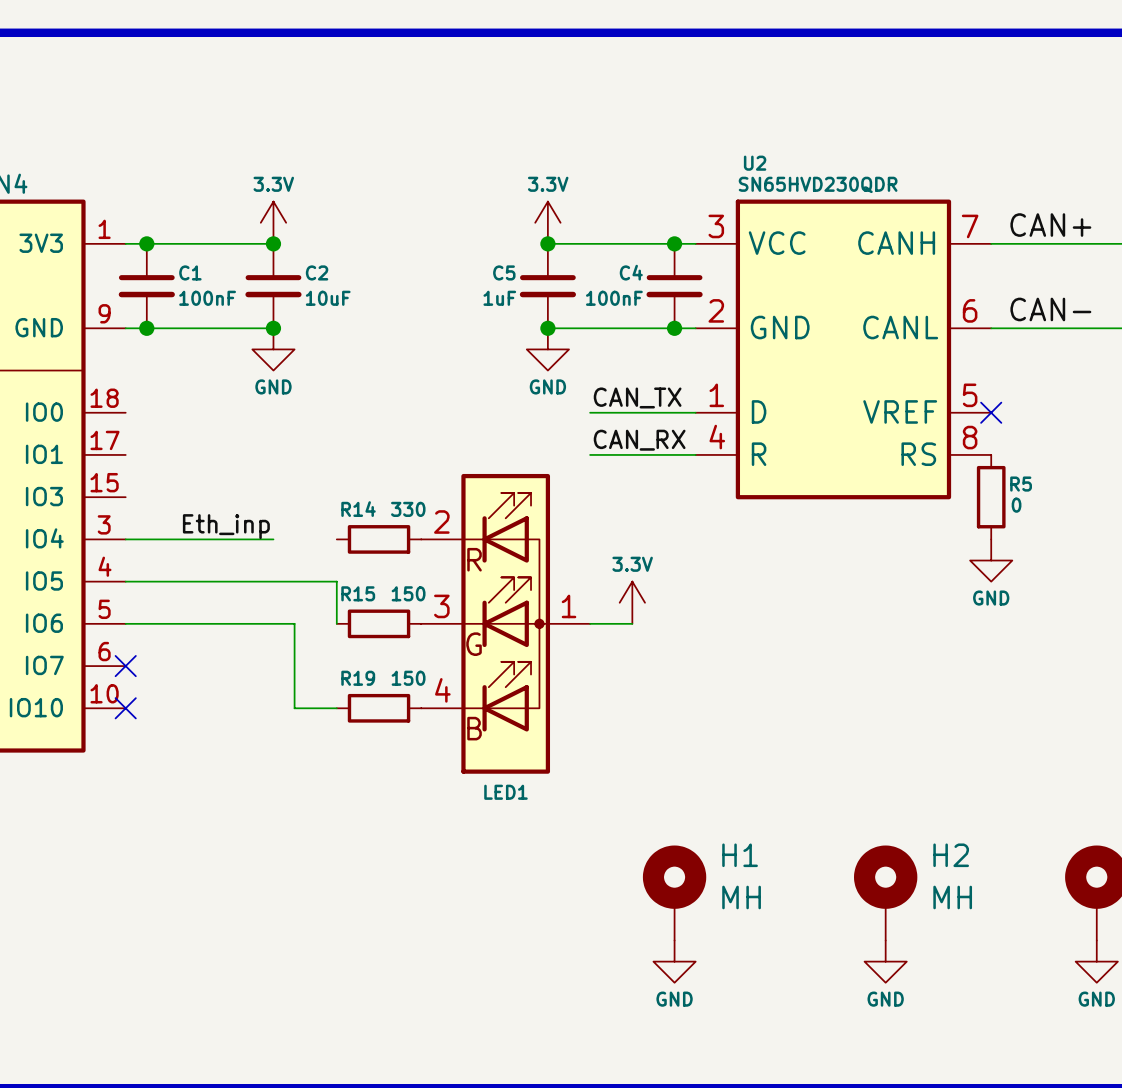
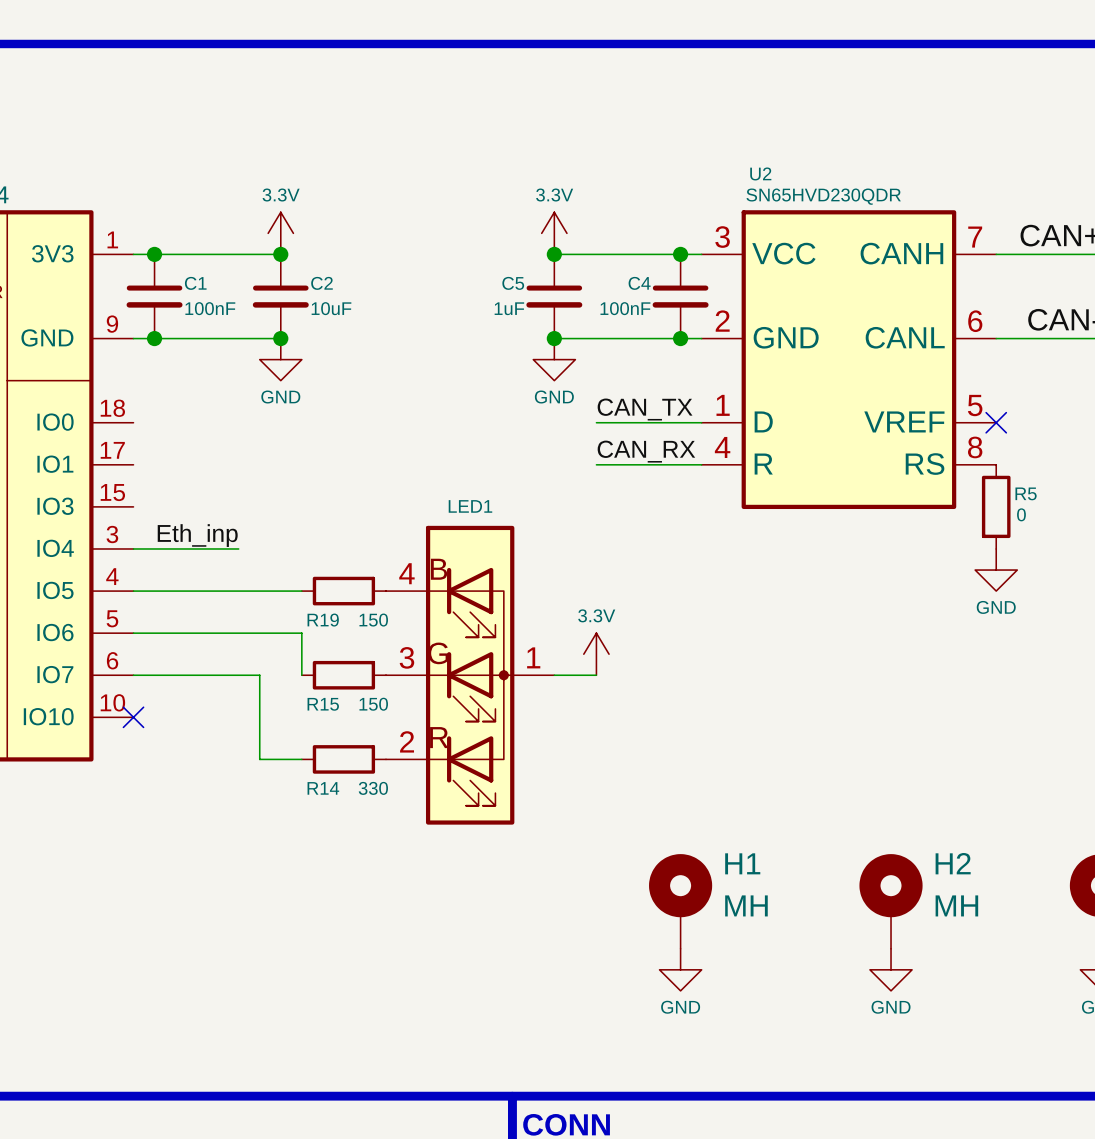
R14 name position: R14 (358, 509) -> R14 (323, 788)
R14 value position: 330 (408, 509) -> 330 (373, 788)
label position: Eth_inp (226, 526) -> Eth_inp (197, 535)
wire: (231, 539) (273, 539) -> none
R14 position: (379, 539) -> (343, 759)
wire: (294, 581) (336, 581) (336, 623) -> none
R15 name position: R15 (358, 593) -> R15 (323, 704)
R15 value position: 150 (408, 593) -> 150 (373, 704)
power symbol position: 3.3V (632, 602) -> 3.3V (596, 654)
R15 position: (379, 623) -> (343, 675)
LED1 flip: as is (505, 623) -> up-down (470, 675)
wire: (590, 623) (632, 623) -> (554, 675) (596, 675)
wire: none -> (133, 675) (259, 675) (259, 759) (301, 759)
no-connect mark: (125, 666) -> none
wire: (294, 666) (294, 708) (336, 708) -> none
R19 name position: R19 (358, 678) -> R19 (323, 620)
R19 value position: 150 (408, 678) -> 150 (373, 620)
R19 position: (379, 708) -> (343, 591)

